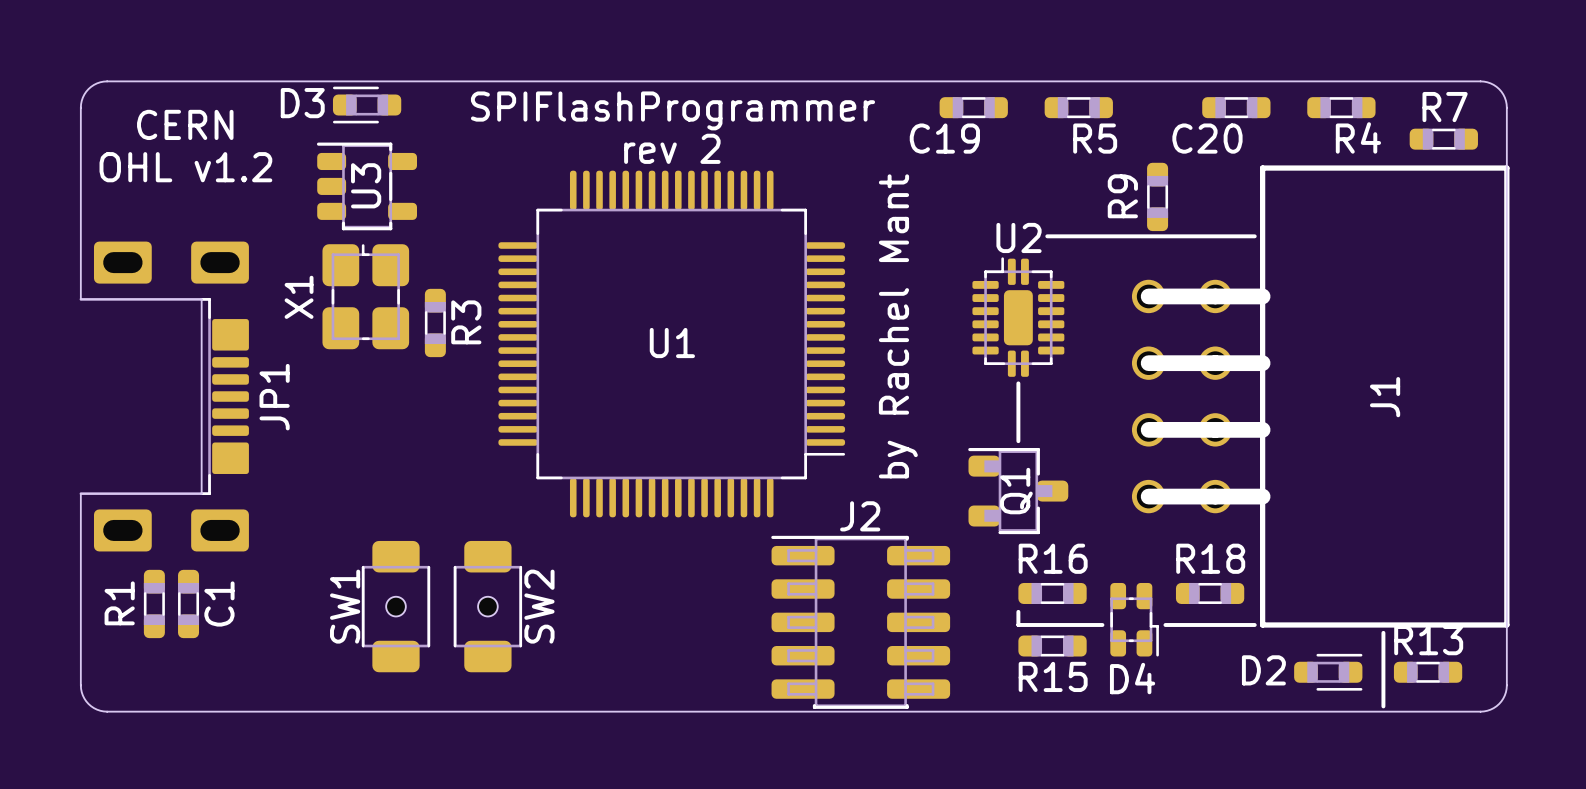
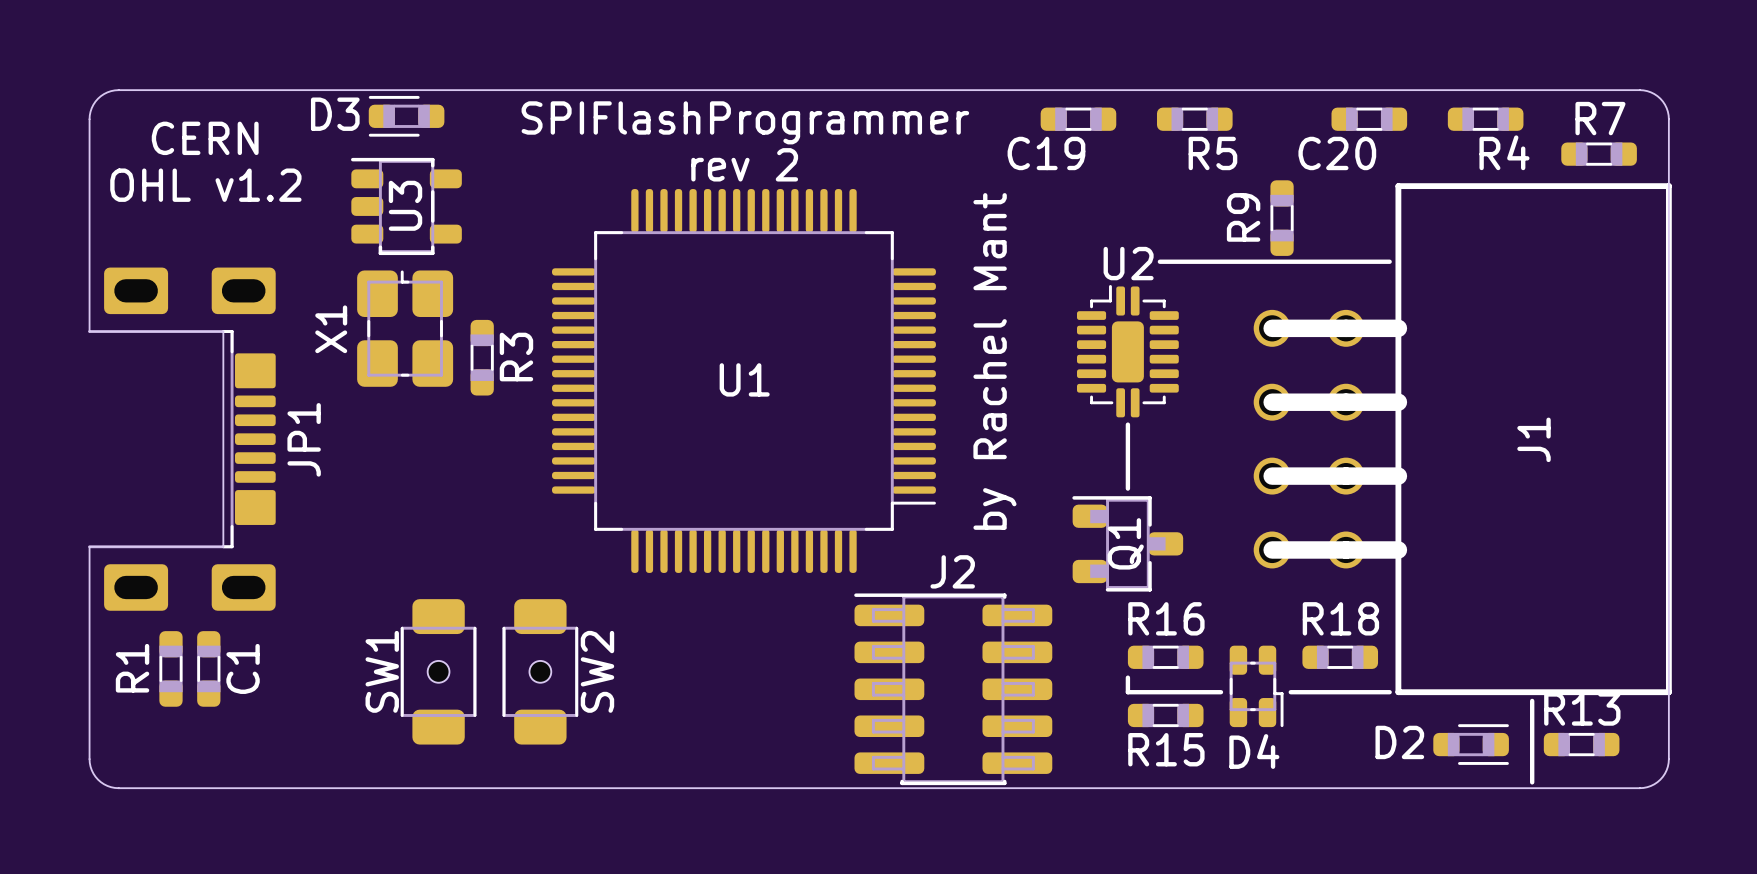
U2 footprint: [972, 257, 1065, 377] -> [1077, 285, 1179, 418]

